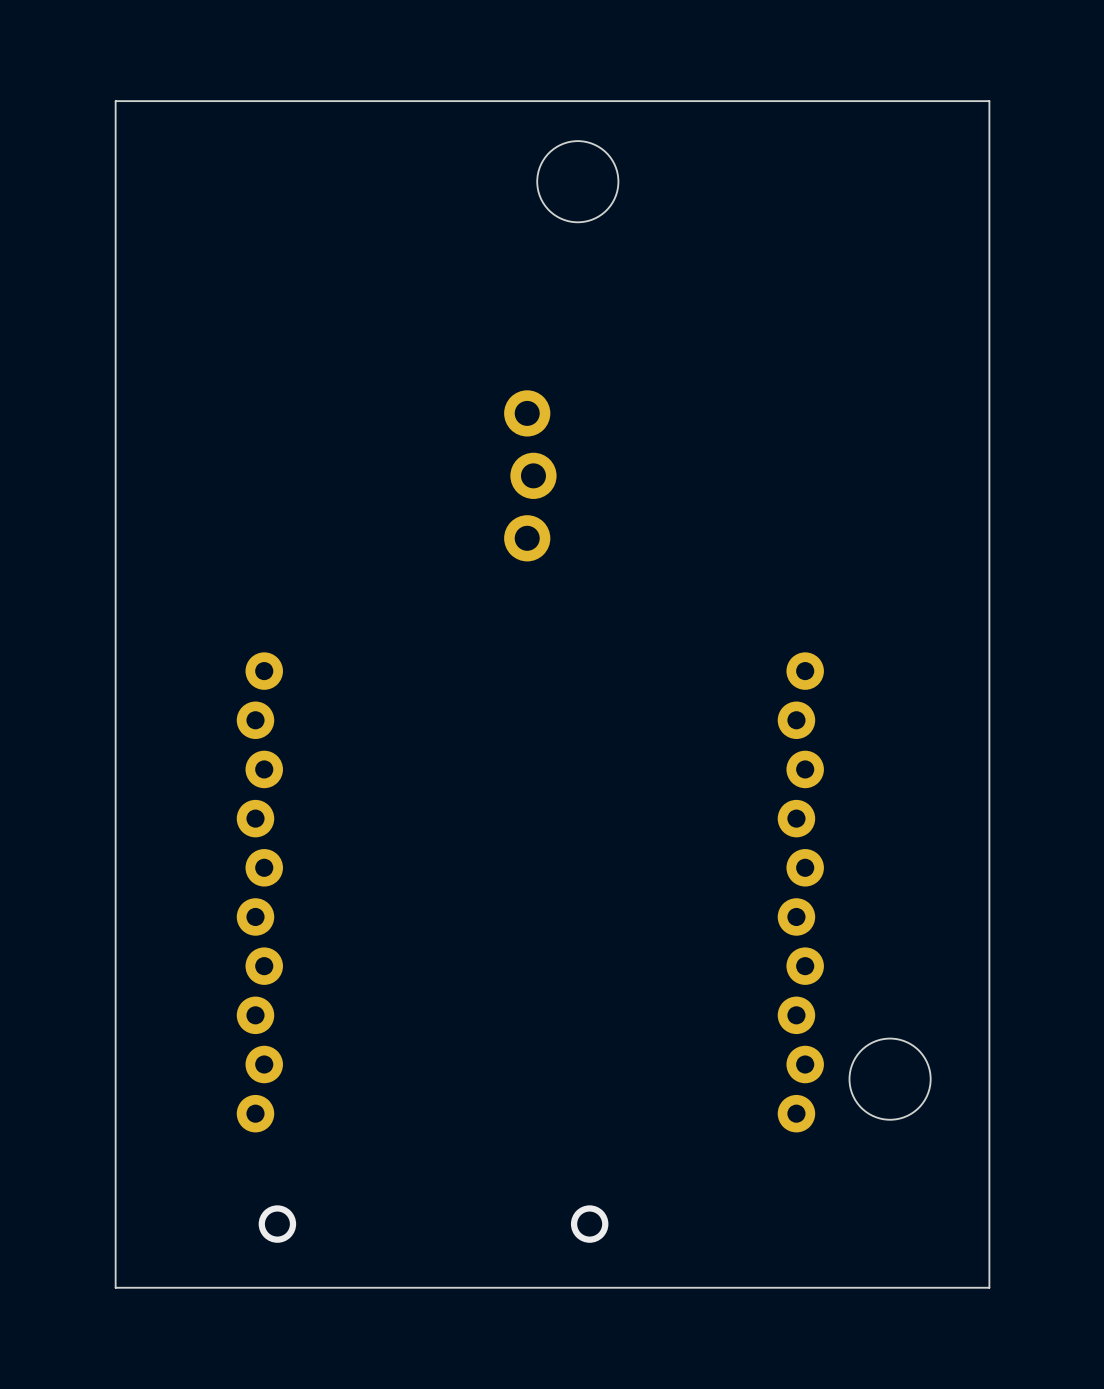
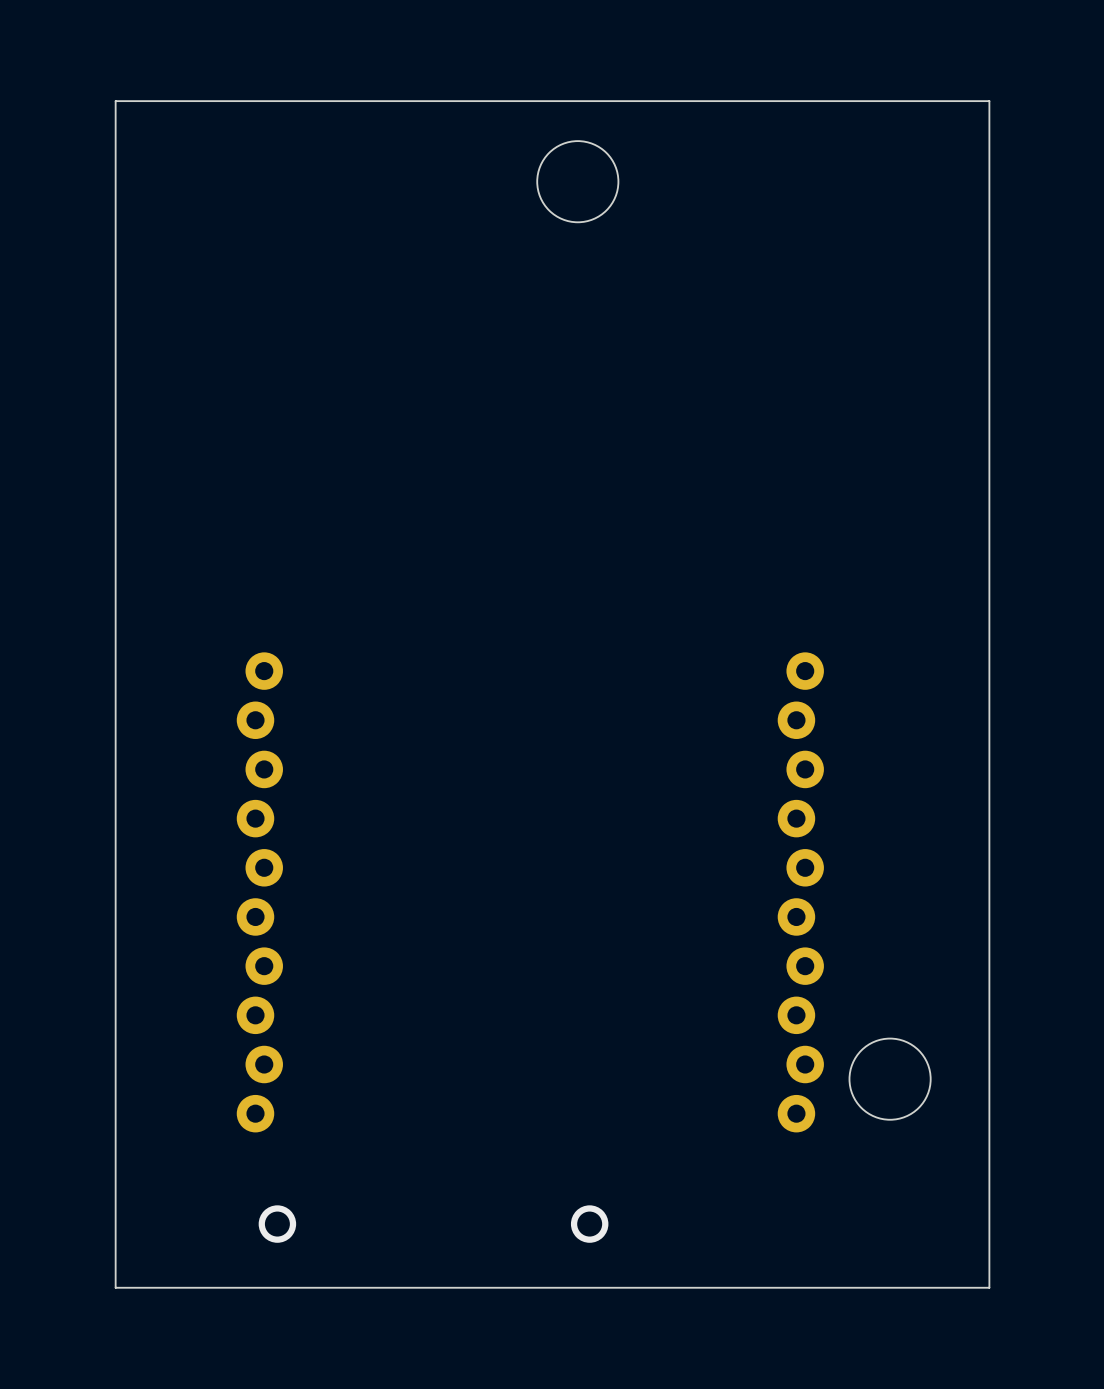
part: (530, 475) -> none

